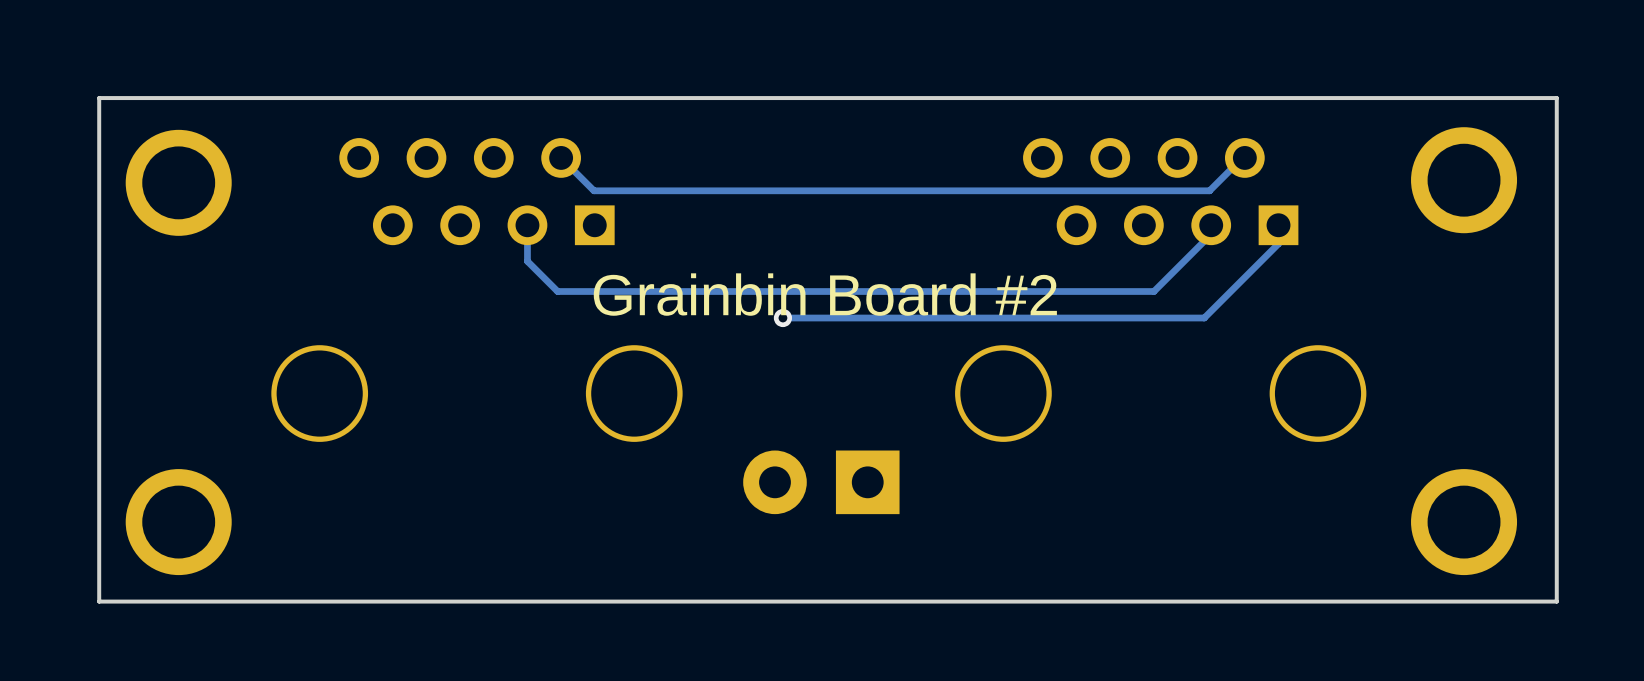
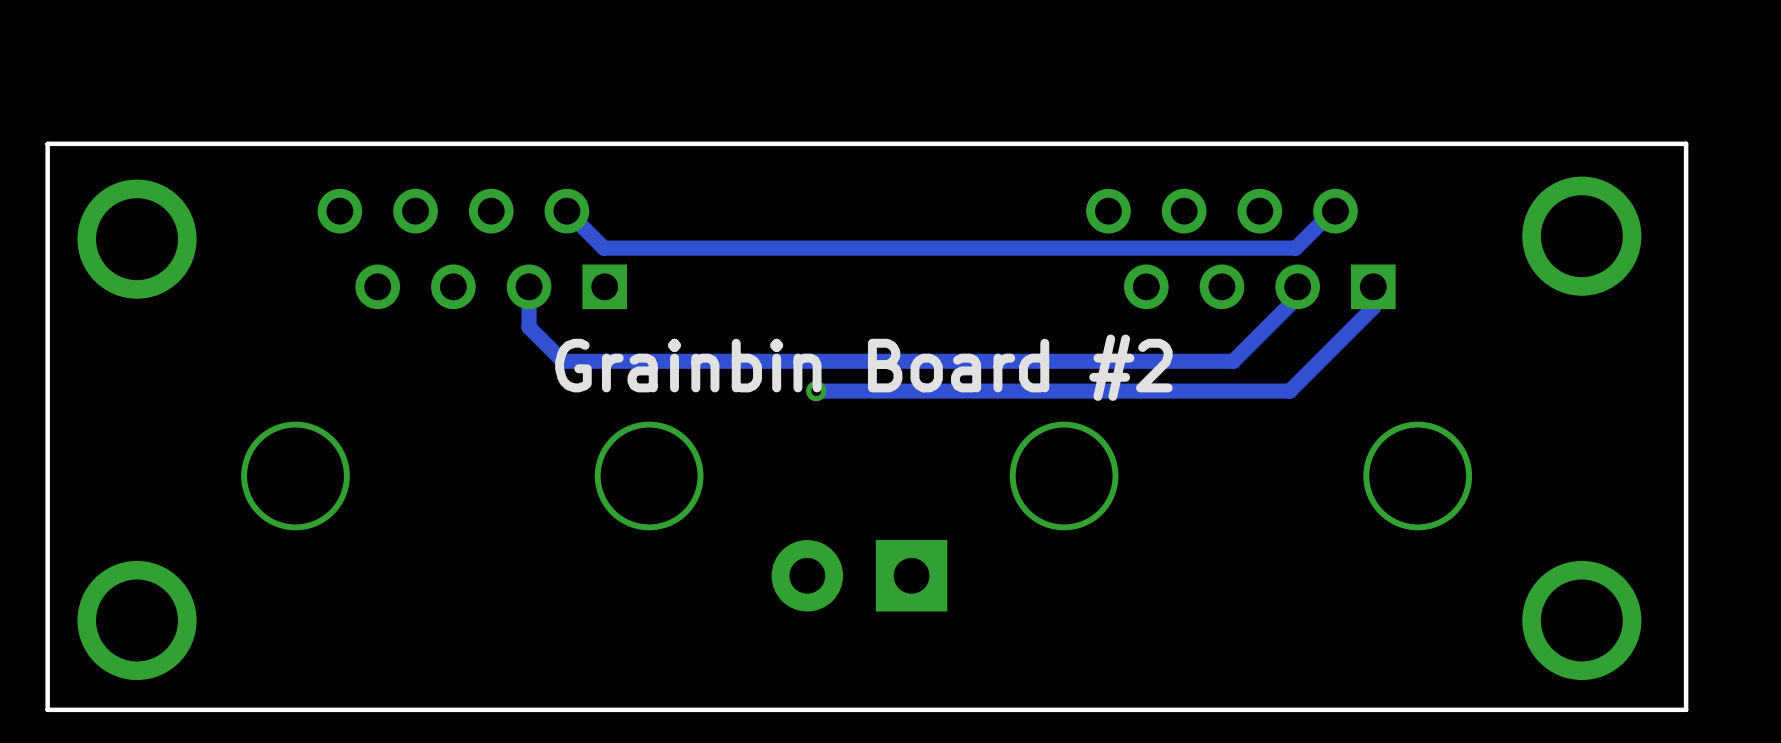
track width: thin (1244, 157) (1242, 157) (1209, 190) (593, 190) (561, 157) -> thick (1335, 211) (1332, 211) (1295, 248) (603, 248) (566, 211)
track width: thin (1211, 225) (1211, 234) (1153, 291) (557, 291) (527, 261) (527, 225) -> thick (1297, 286) (1297, 296) (1233, 361) (563, 361) (529, 327) (529, 286)
track width: thin (1278, 225) (1278, 243) (1204, 318) (782, 318) -> thick (1373, 286) (1373, 307) (1289, 391) (816, 391)

